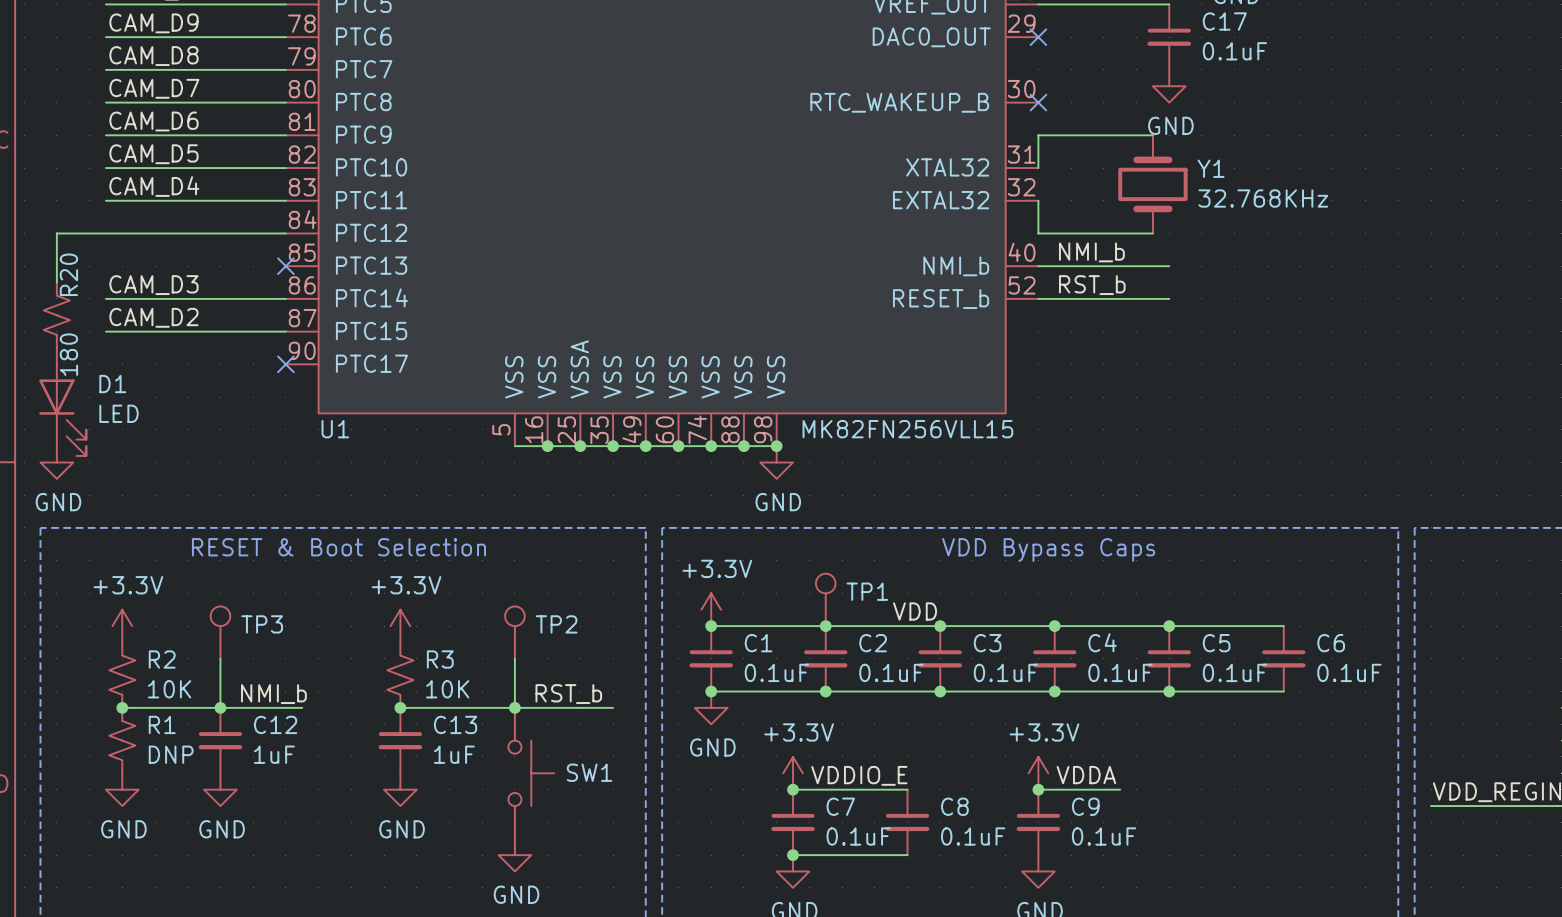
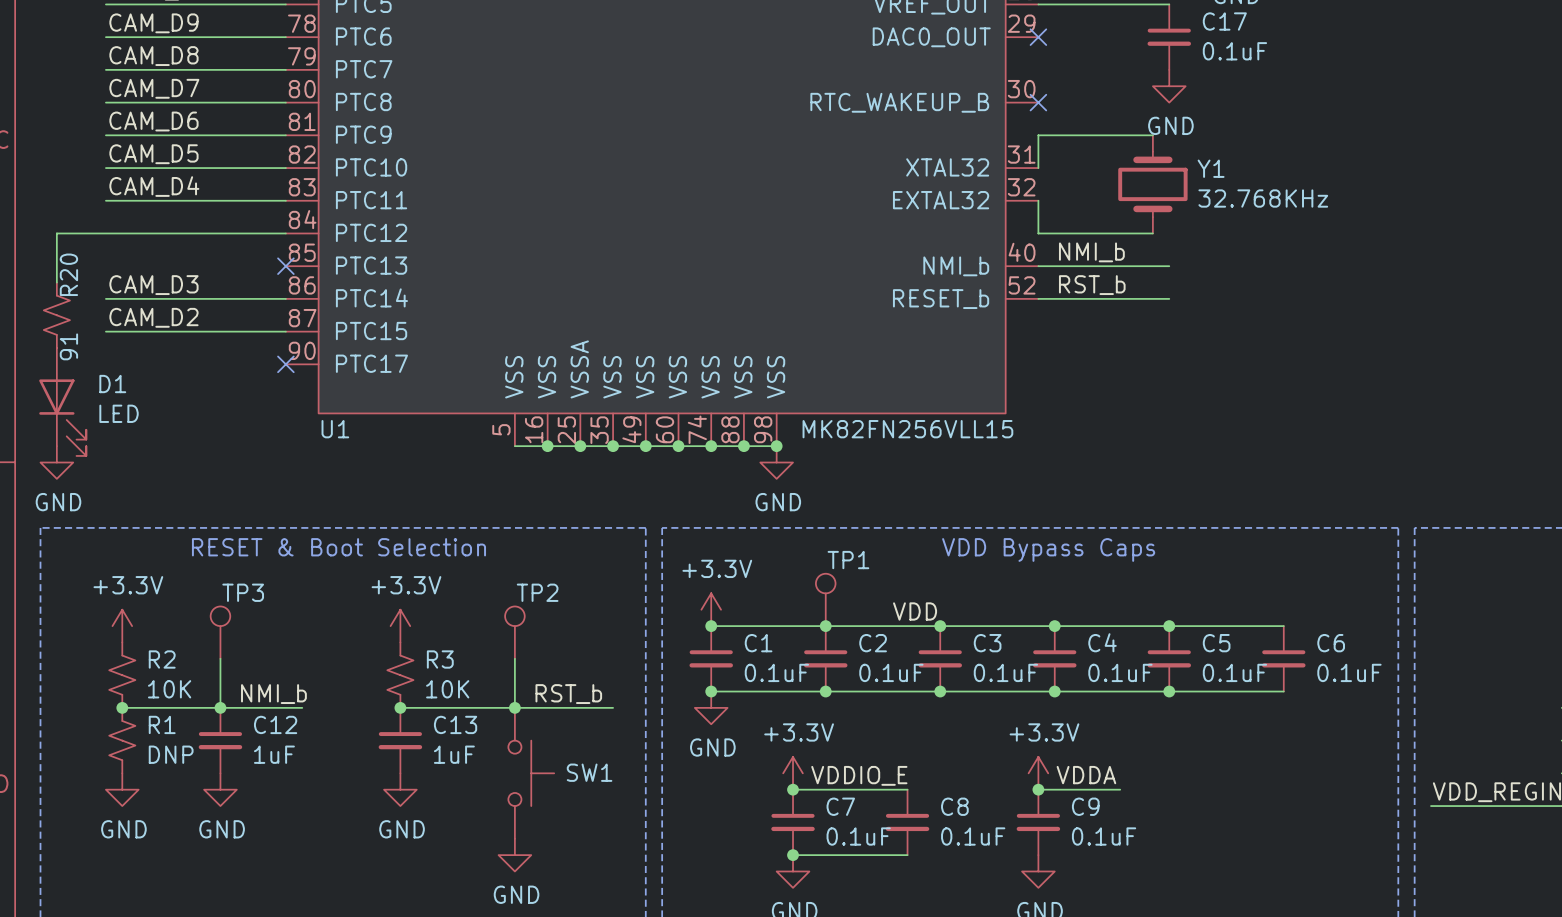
R20 value: 180 (68, 354) -> 91 (68, 346)
TP1 name position: TP1 (867, 591) -> TP1 (848, 560)
TP3 name position: TP3 (262, 624) -> TP3 (243, 592)
TP2 name position: TP2 (556, 624) -> TP2 (537, 592)

